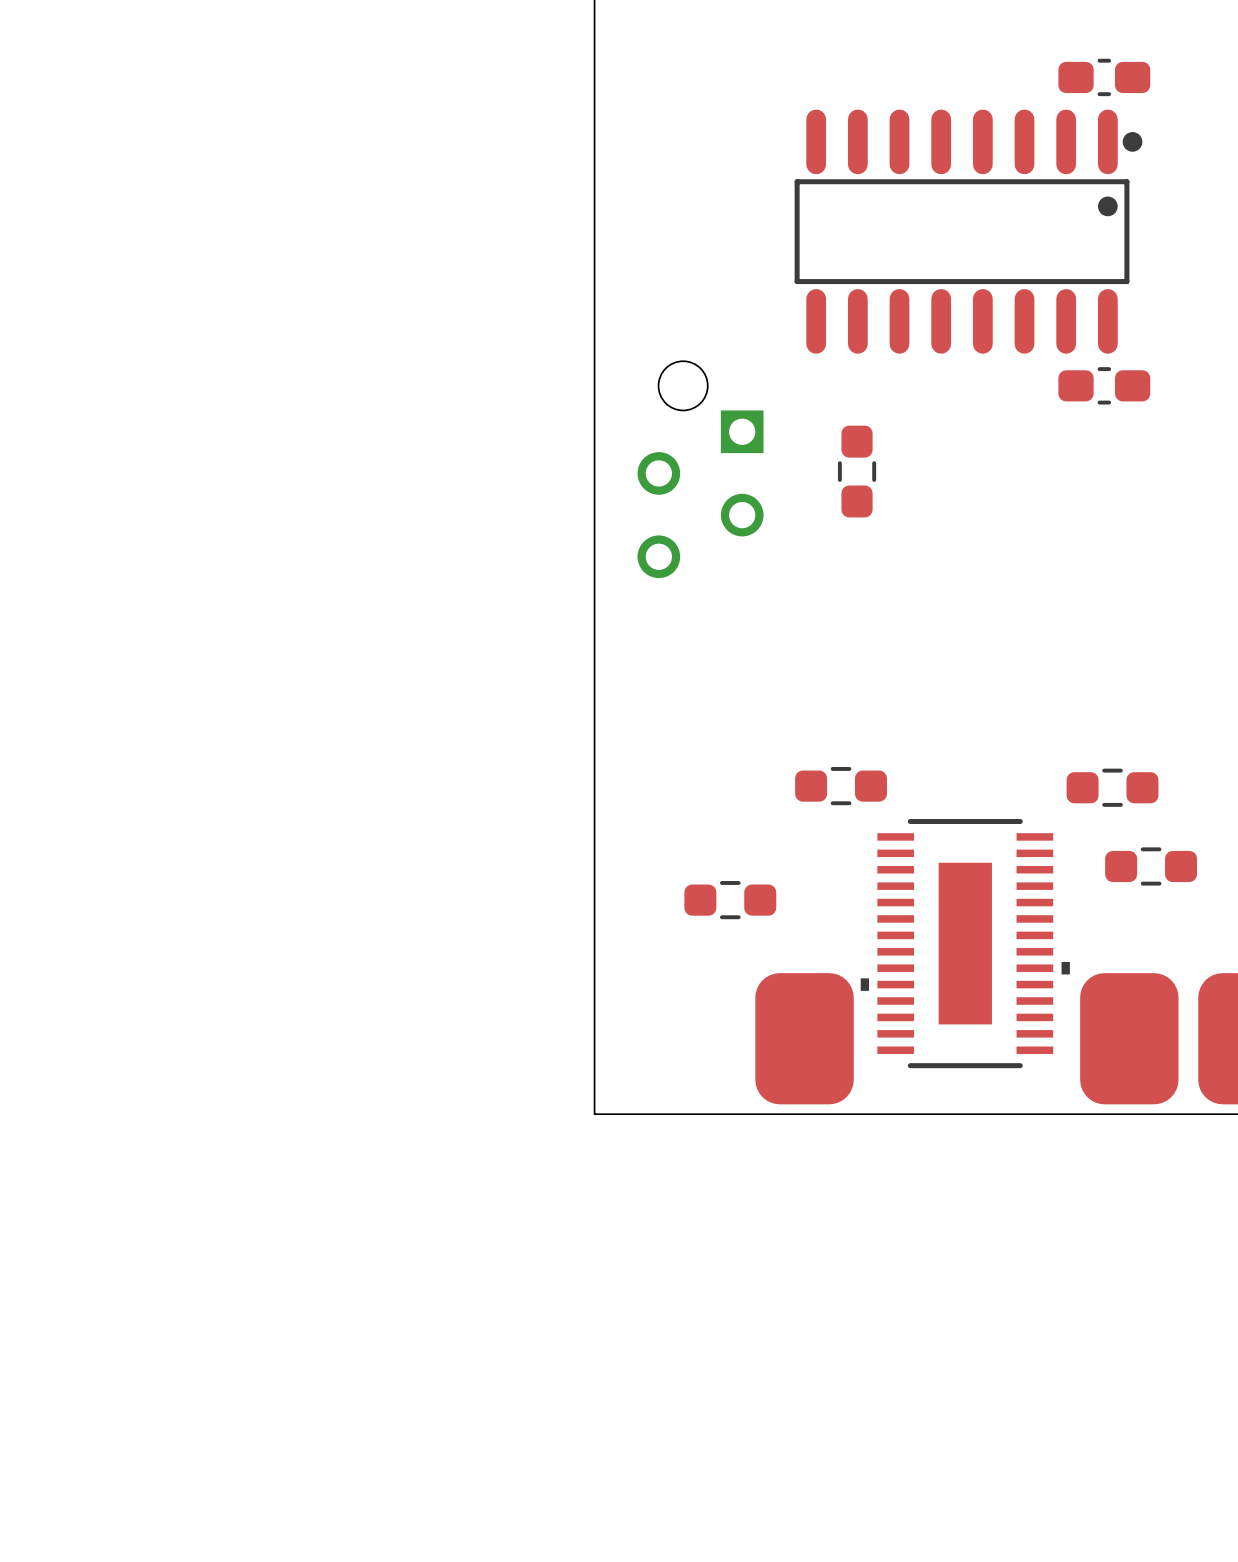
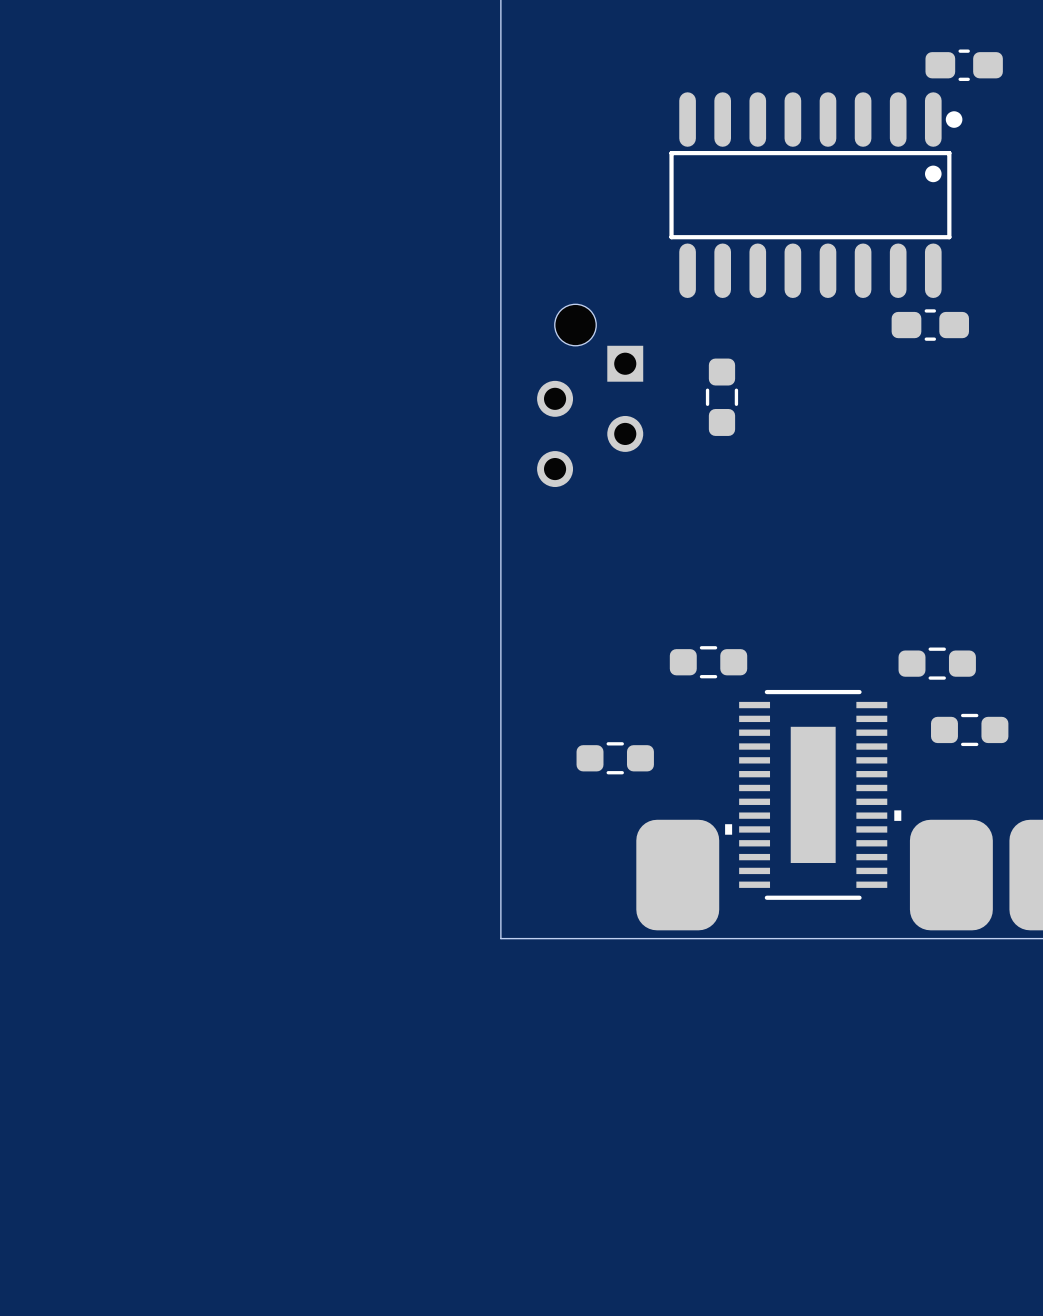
part position: (1104, 77) -> (964, 65)

